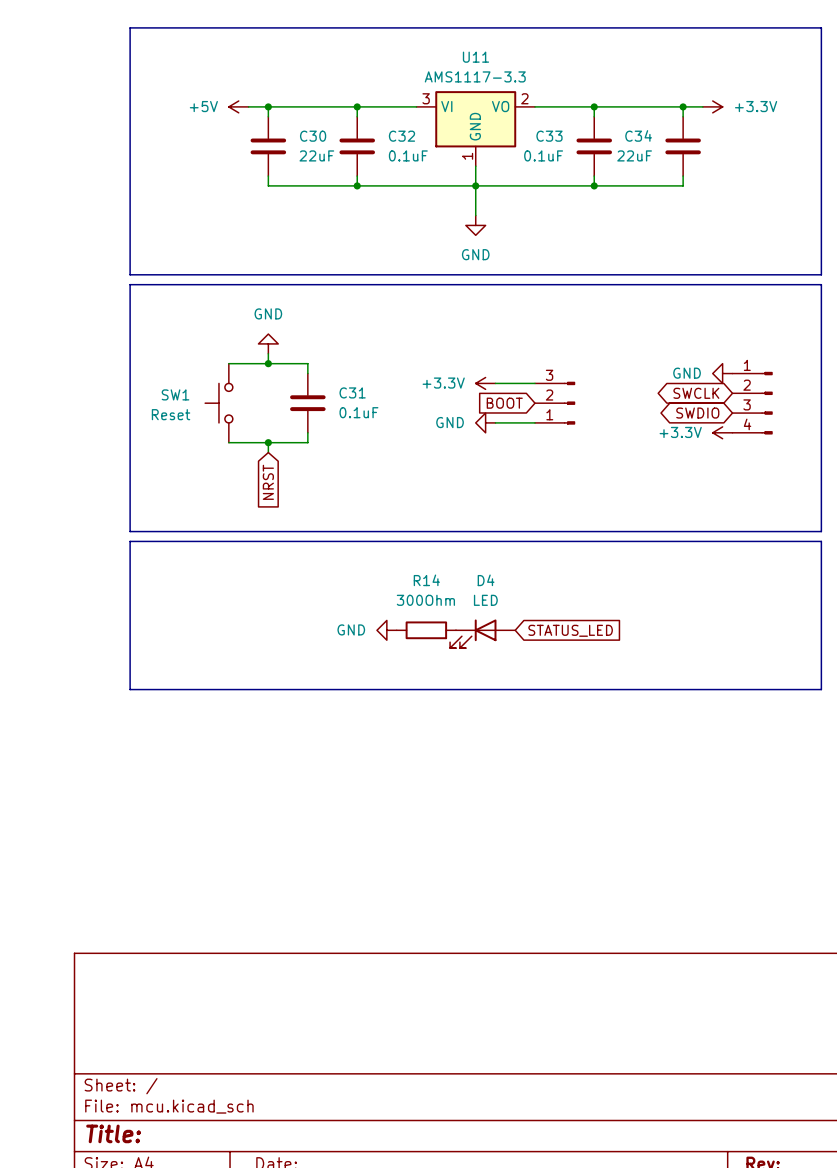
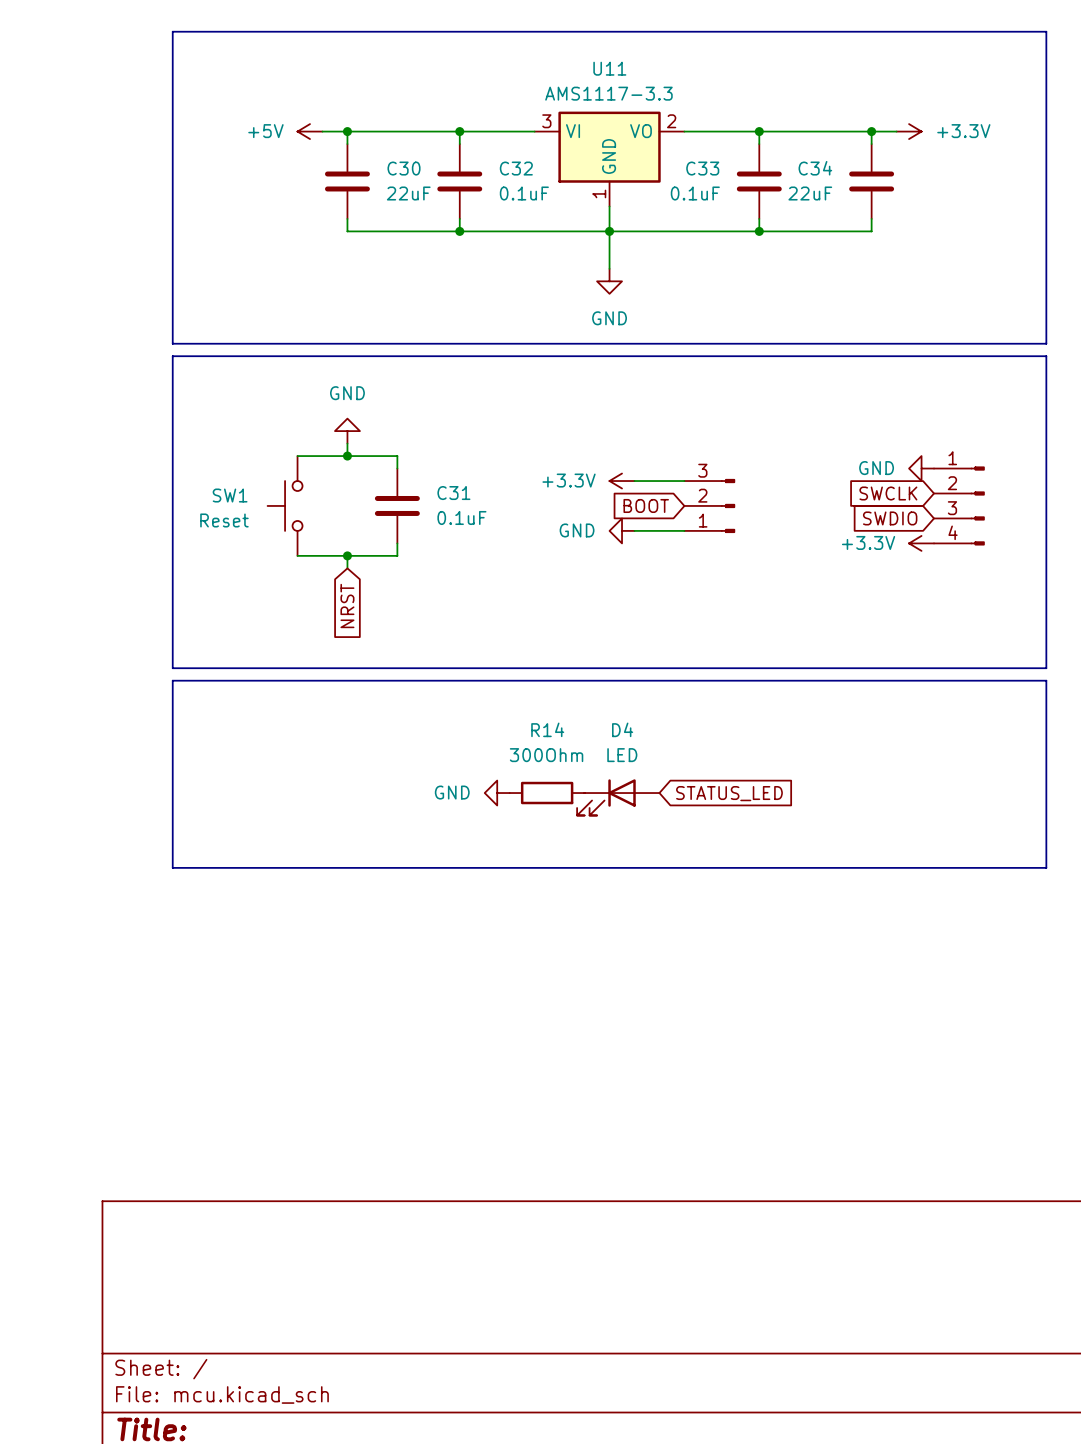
global label shape: bidirectional (696, 393) -> input (888, 493)
global label shape: bidirectional (697, 413) -> input (890, 518)

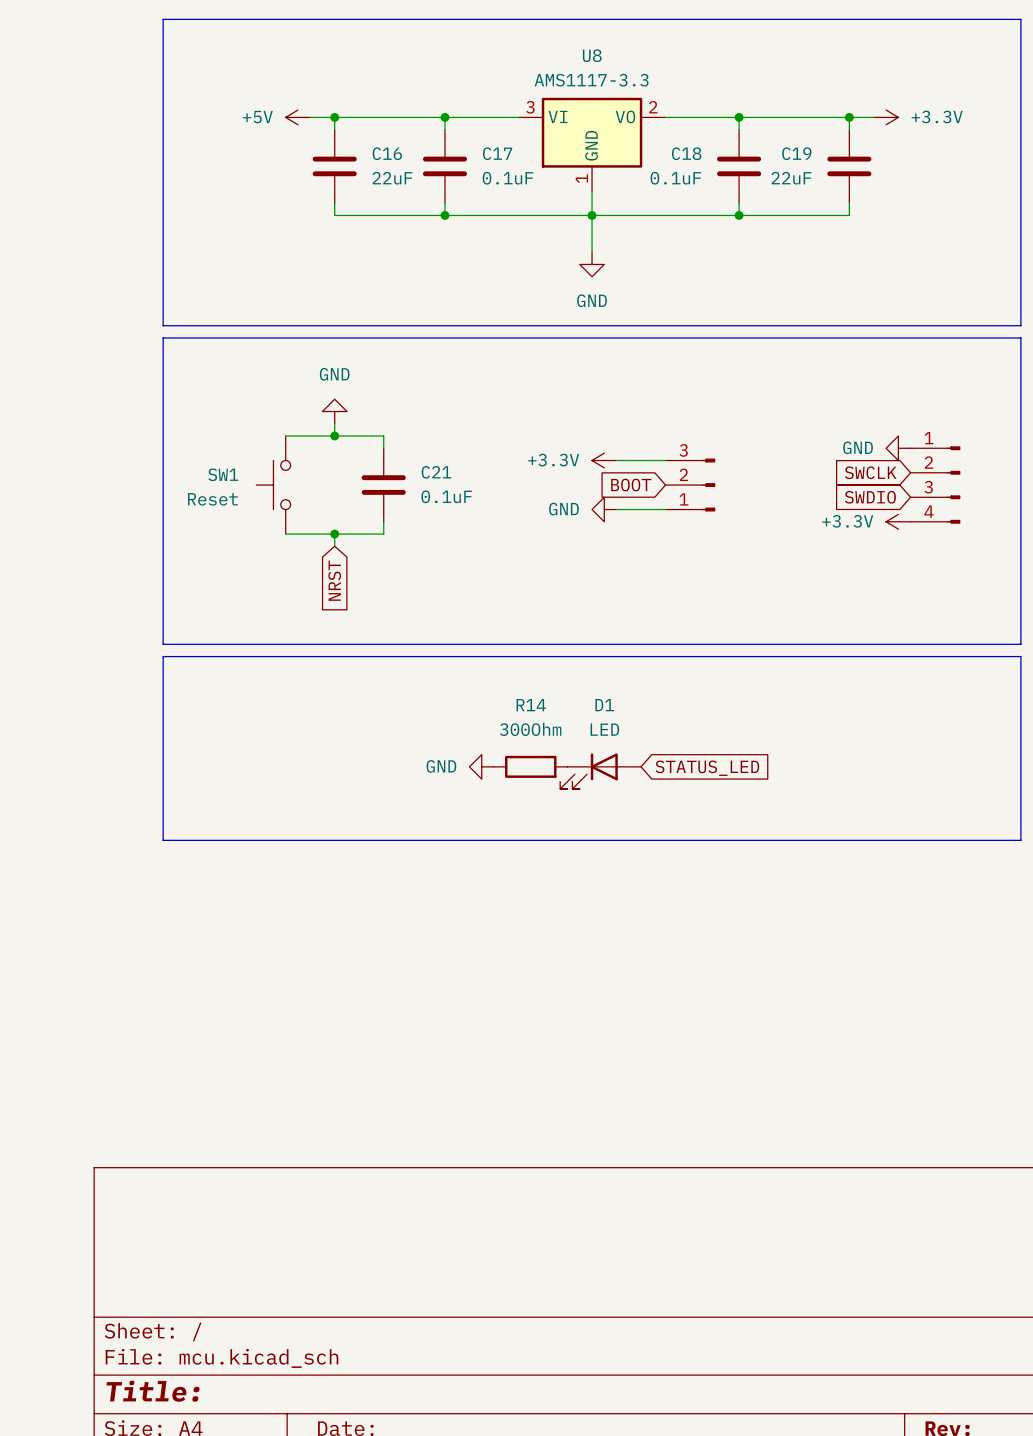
U11 name: U11 (609, 68) -> U8 (592, 55)
C30 name: C30 (404, 168) -> C16 (387, 153)
C32 name: C32 (516, 168) -> C17 (497, 153)
C33 name: C33 (702, 168) -> C18 (686, 153)
C34 name: C34 (815, 168) -> C19 (796, 153)
C31 name: C31 (453, 493) -> C21 (436, 472)
D4 name: D4 (622, 729) -> D1 (604, 705)

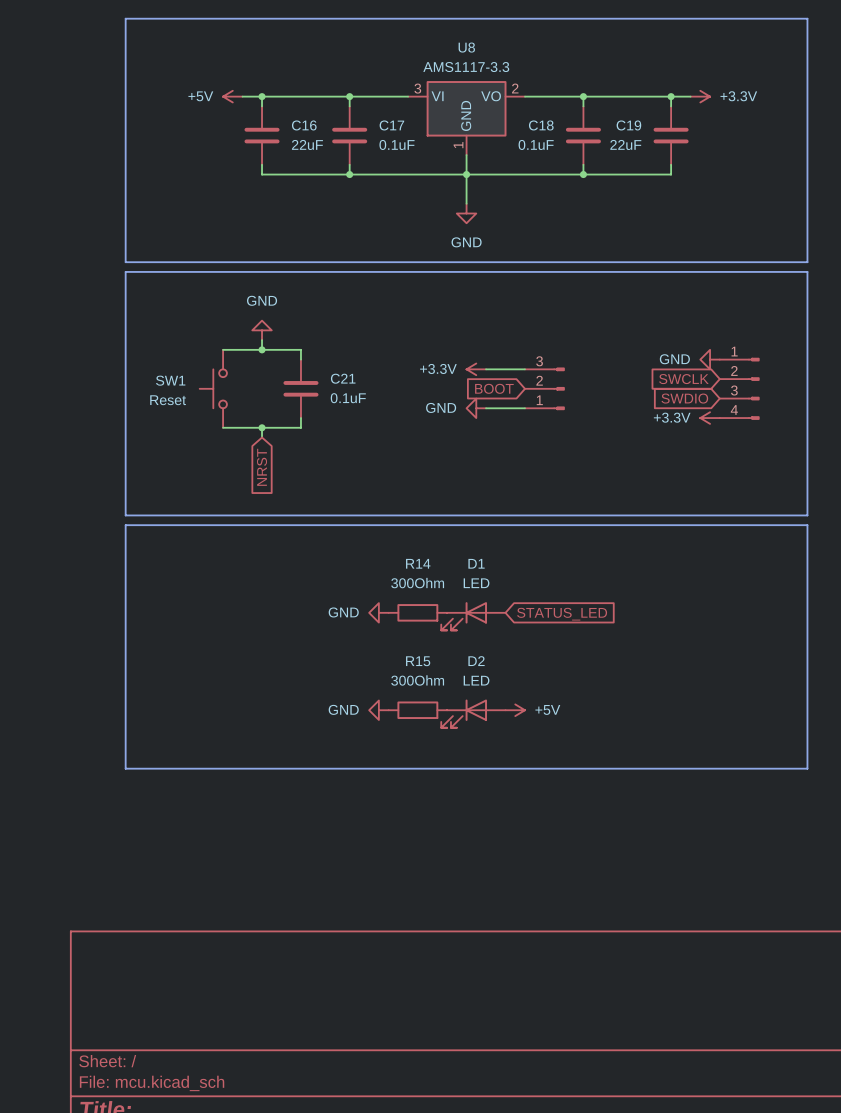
line: (163, 840) (1020, 840) -> (125, 671) (125, 768) (807, 768) (807, 671)
power symbol: none -> GND (378, 710)
R15: none -> 300Ohm (417, 710)
power symbol: none -> +5V (515, 710)
D2: none -> LED (473, 713)

